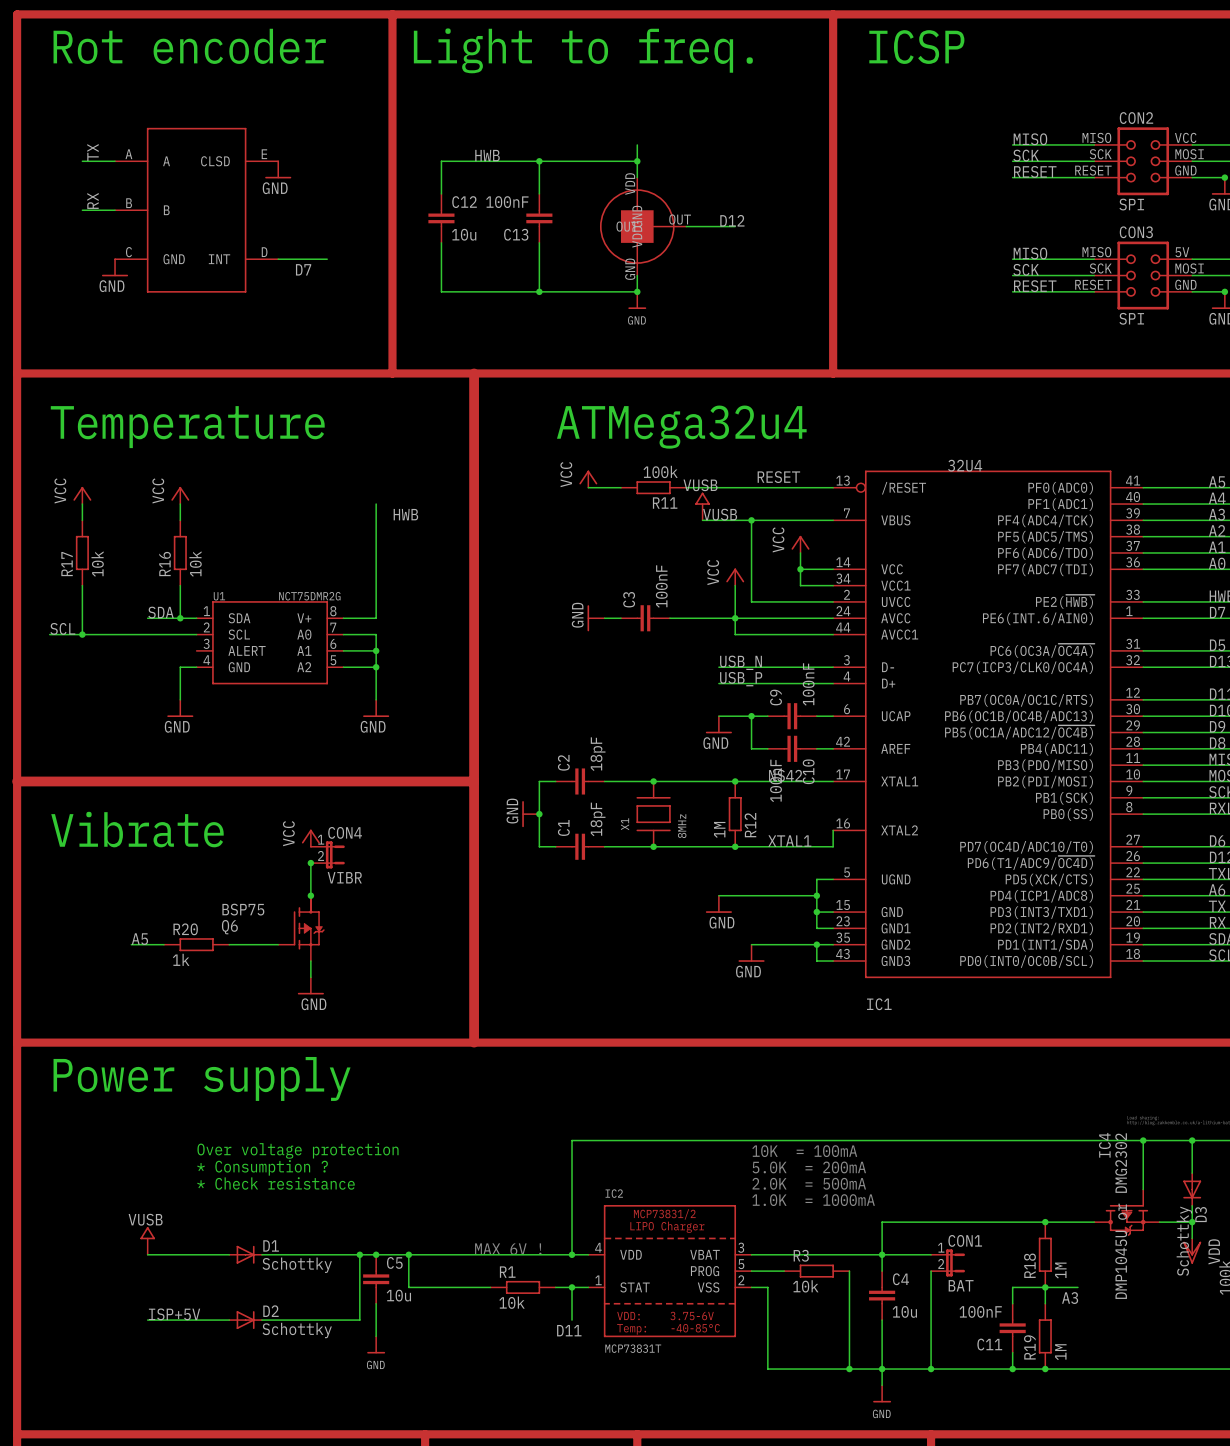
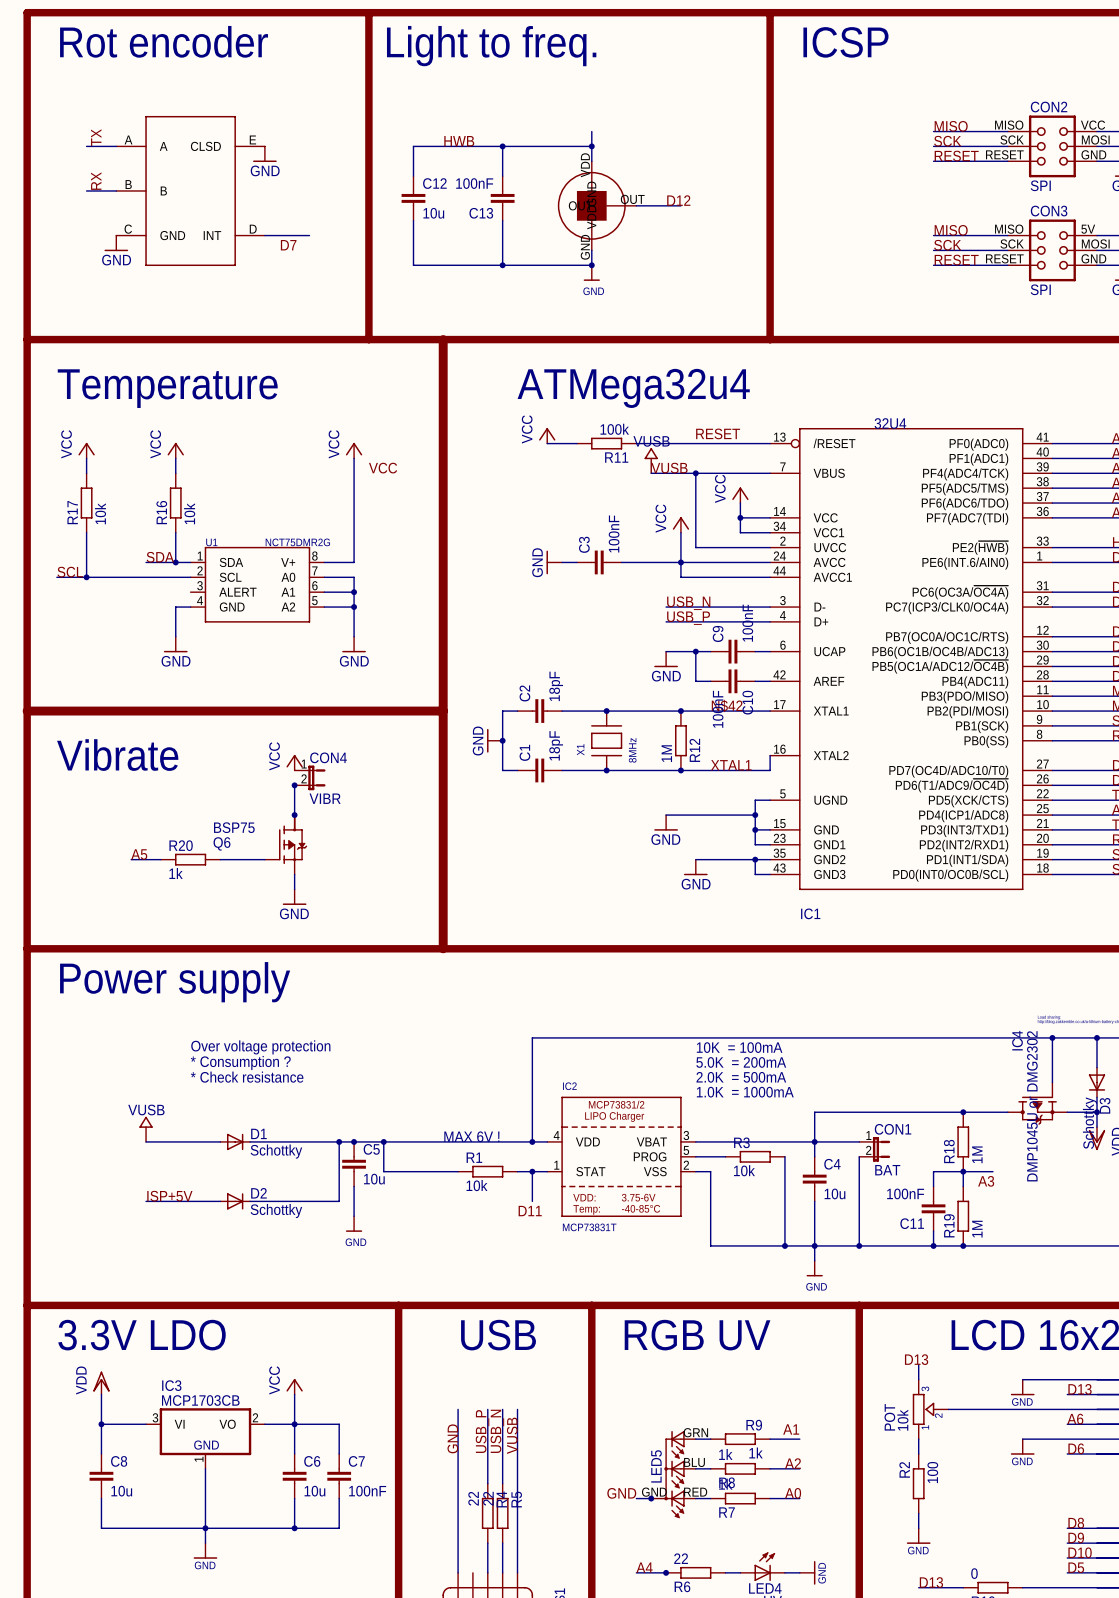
power symbol: none -> VCC (354, 450)
label: HWB (405, 514) -> VCC (383, 468)

